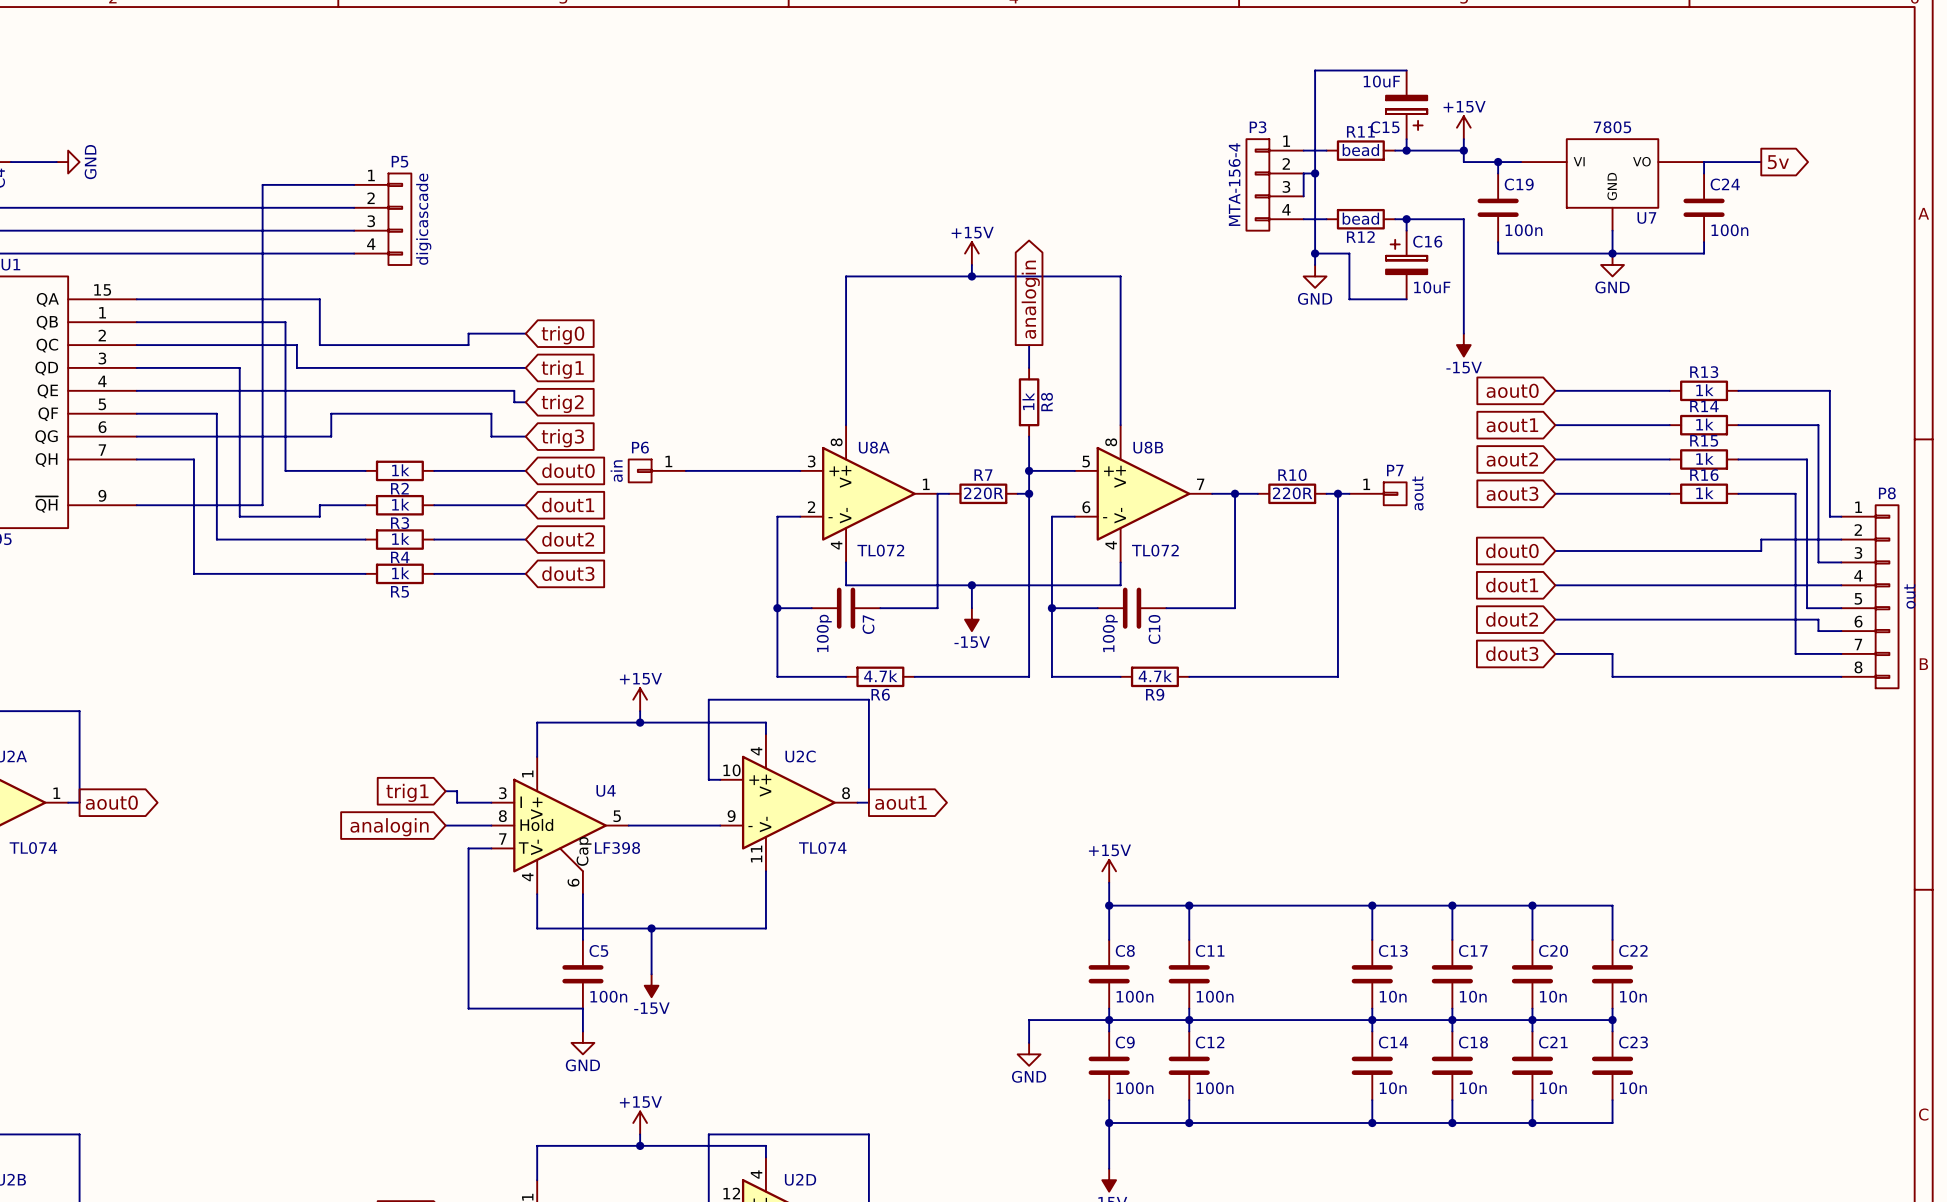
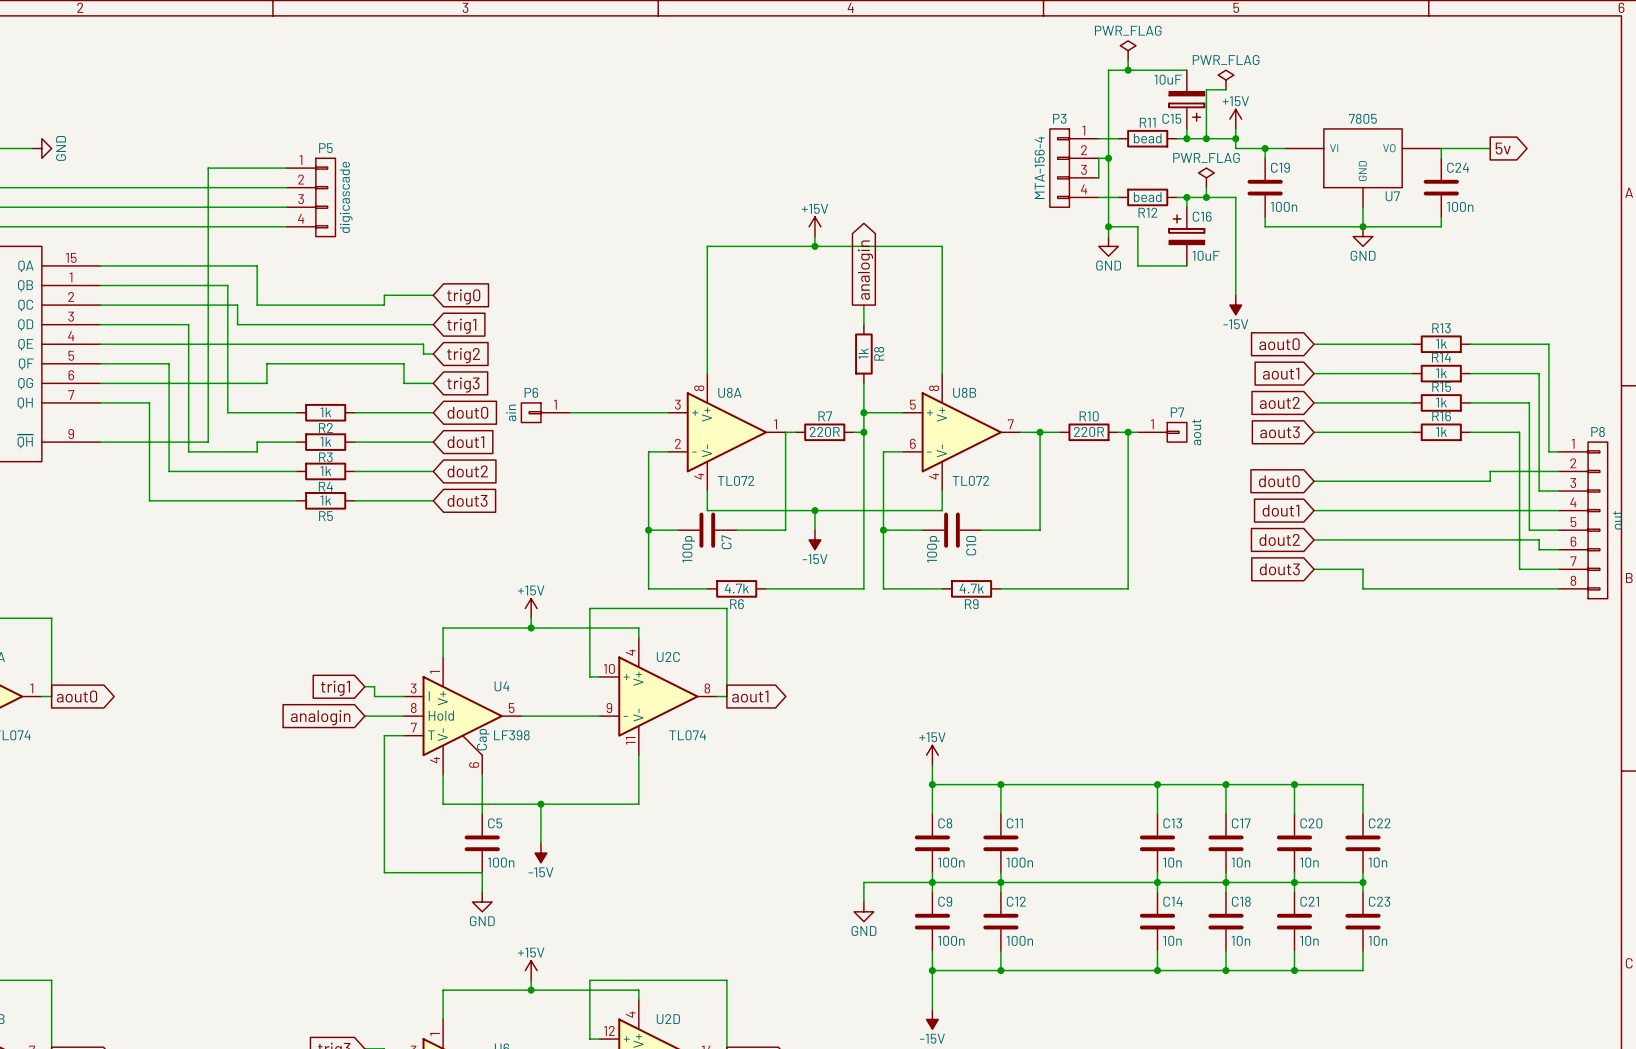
power symbol: none -> PWR_FLAG (1128, 50)
wire: none -> (1128, 60) (1128, 70)
junction: none -> (1128, 70)
power symbol: none -> PWR_FLAG (1225, 80)
wire: none -> (1225, 89) (1206, 89) (1206, 138)
junction: none -> (1206, 138)
power symbol: none -> PWR_FLAG (1206, 177)
wire: none -> (1206, 187) (1206, 197)
junction: none -> (1206, 197)

